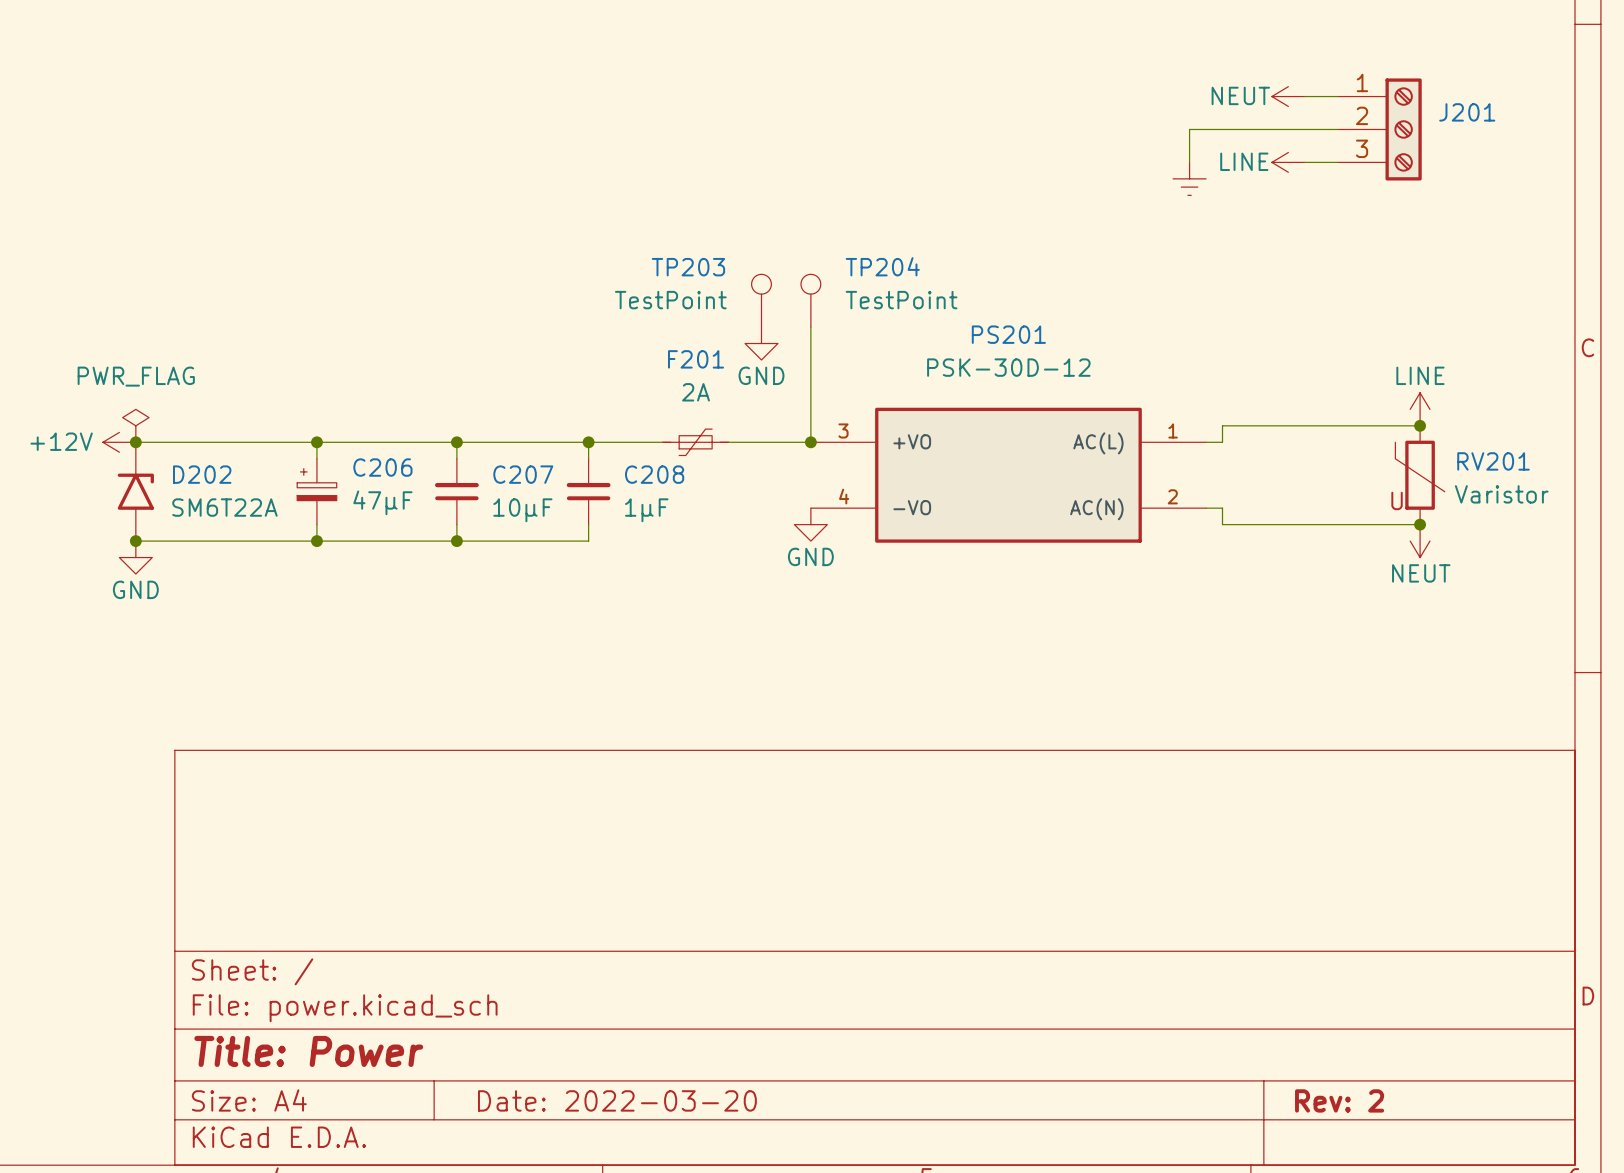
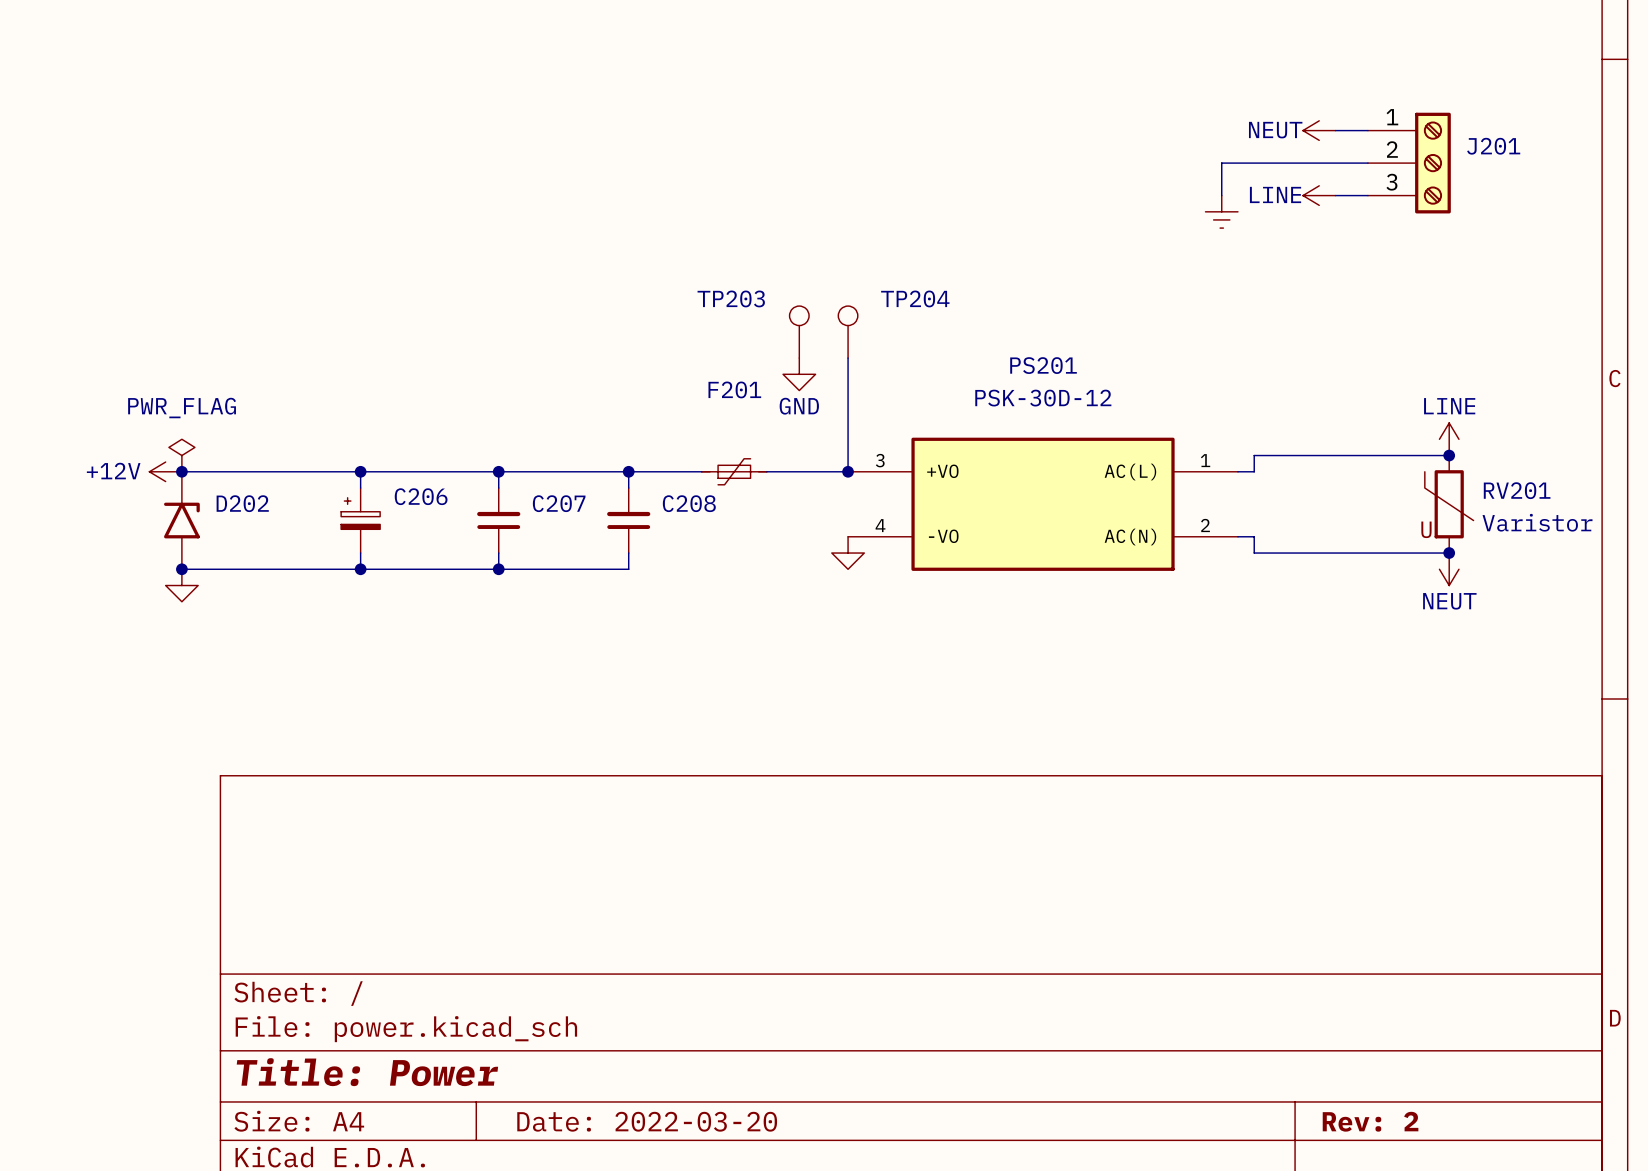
TP203 value: TestPoint (670, 300) -> none
TP204 value: TestPoint (901, 300) -> none
F201 value: 2A (696, 392) -> none
C206 value: 47µF (382, 502) -> none
D202 value: SM6T22A (224, 507) -> none
C207 value: 10µF (522, 510) -> none
C208 value: 1µF (646, 510) -> none
power symbol text: GND (810, 556) -> none
power symbol text: GND (135, 589) -> none

